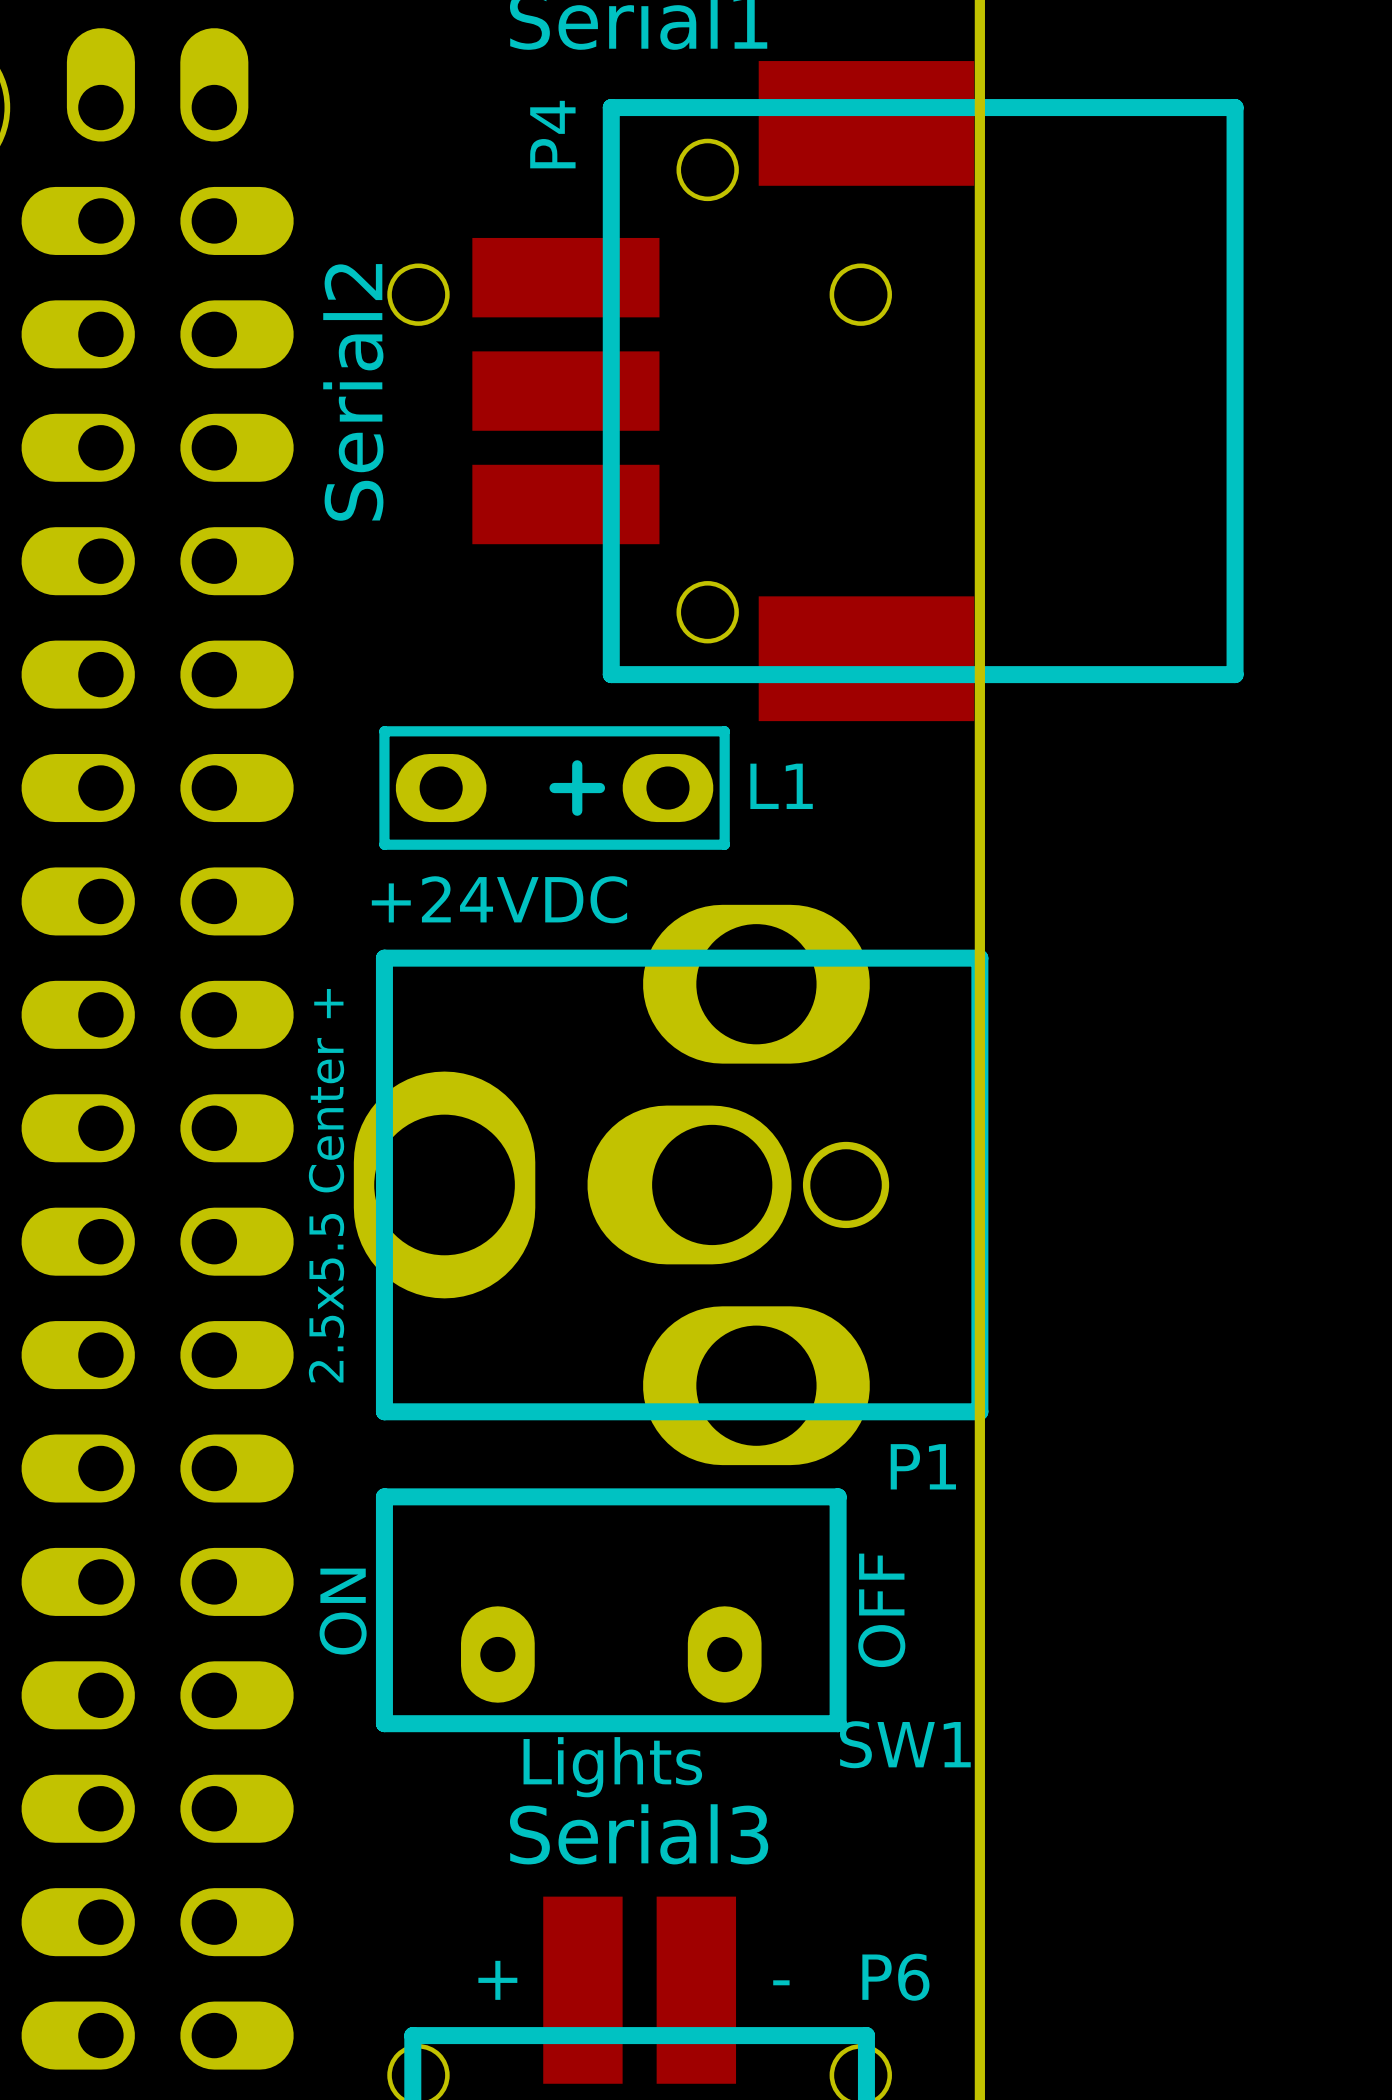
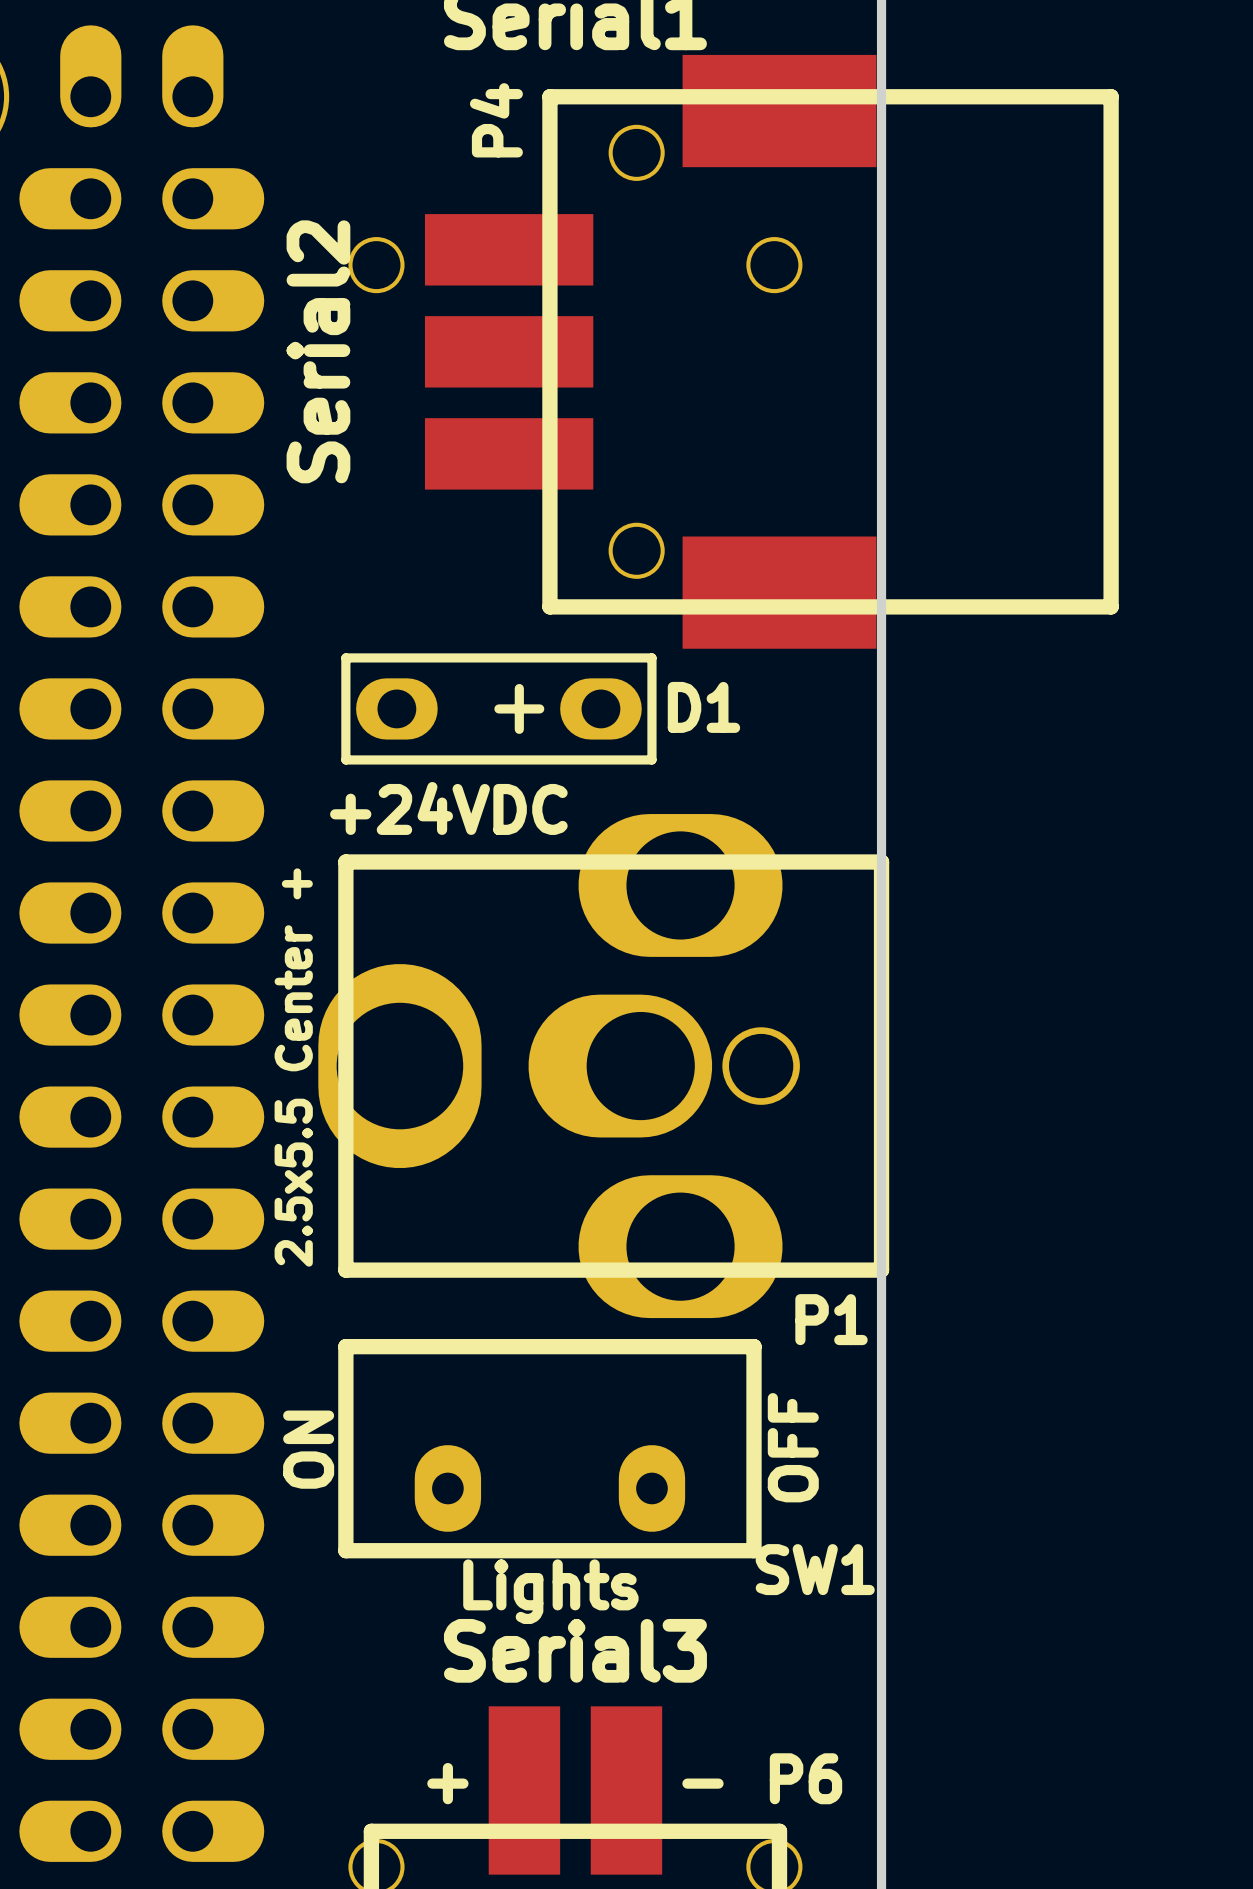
L1 name: L1 (781, 786) -> D1 (703, 707)

